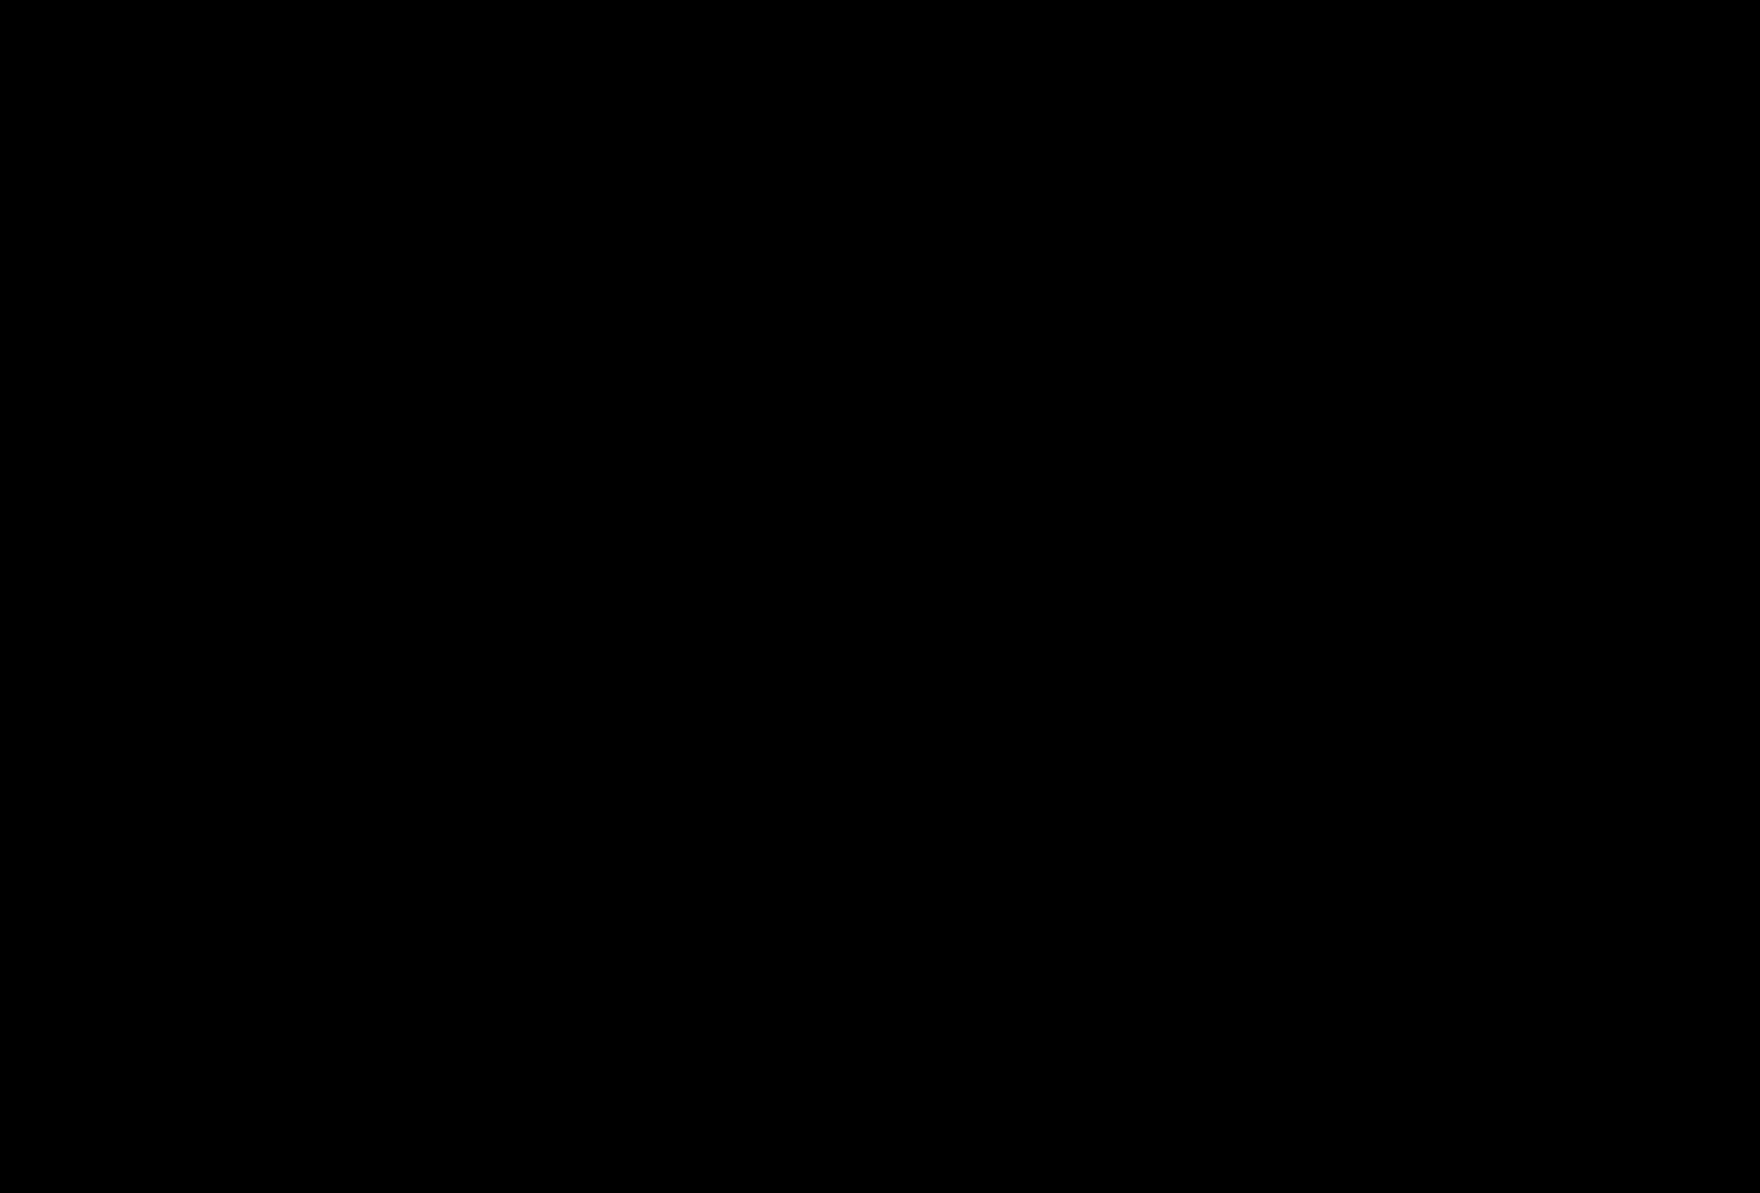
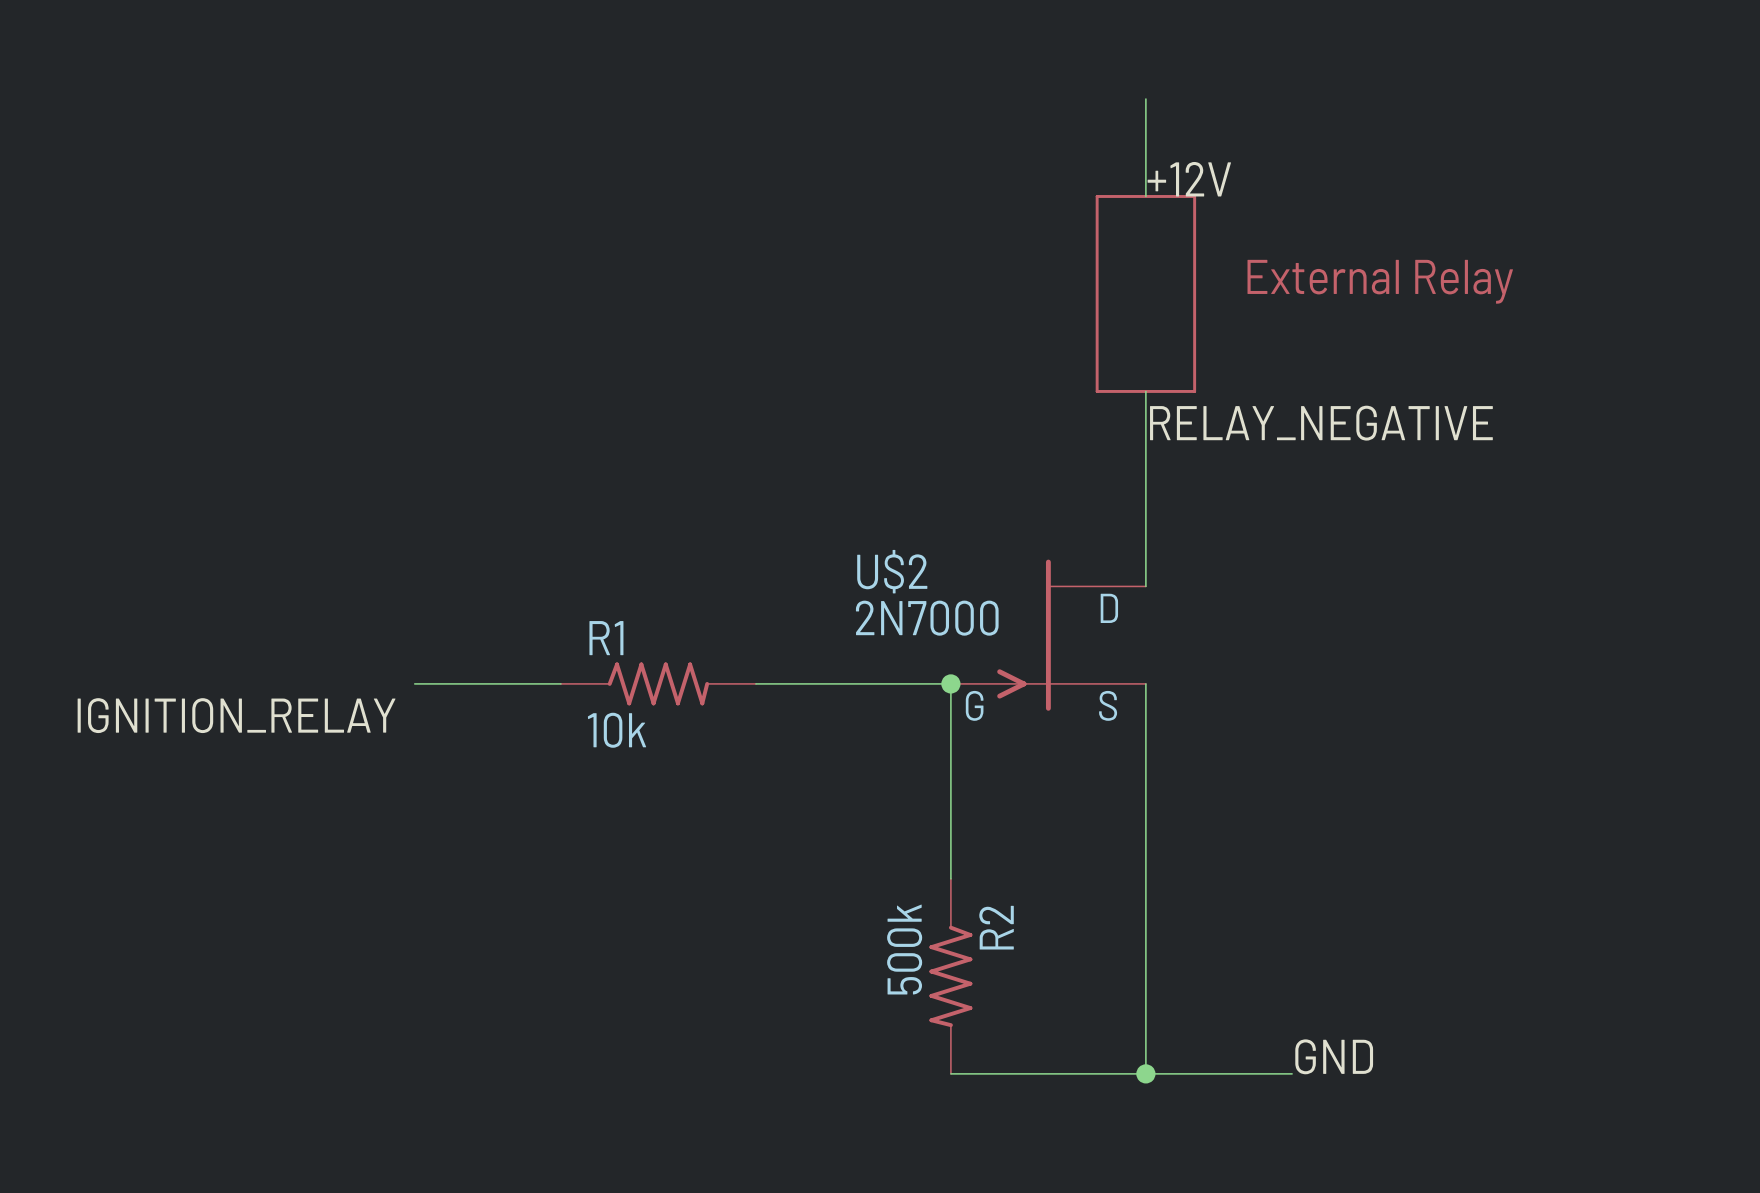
wire: none -> (1145, 98) (1145, 196)
label: none -> +12V (1189, 179)
line: none -> (1097, 196) (1097, 391) (1194, 391) (1194, 196) (1097, 196)
text: none -> External Relay (1380, 281)
wire: none -> (1145, 391) (1145, 586)
label: none -> RELAY_NEGATIVE (1321, 423)
U$2: none -> 2N7000 (1048, 635)
wire: none -> (414, 683) (560, 683)
R1: none -> 10k (658, 683)
wire: none -> (755, 683) (950, 683) (950, 878)
junction: none -> (950, 683)
wire: none -> (1145, 683) (1145, 1073)
label: none -> IGNITION_RELAY (236, 715)
R2: none -> 500k (950, 976)
label: none -> GND (1334, 1056)
wire: none -> (950, 1073) (1292, 1073)
junction: none -> (1145, 1073)

